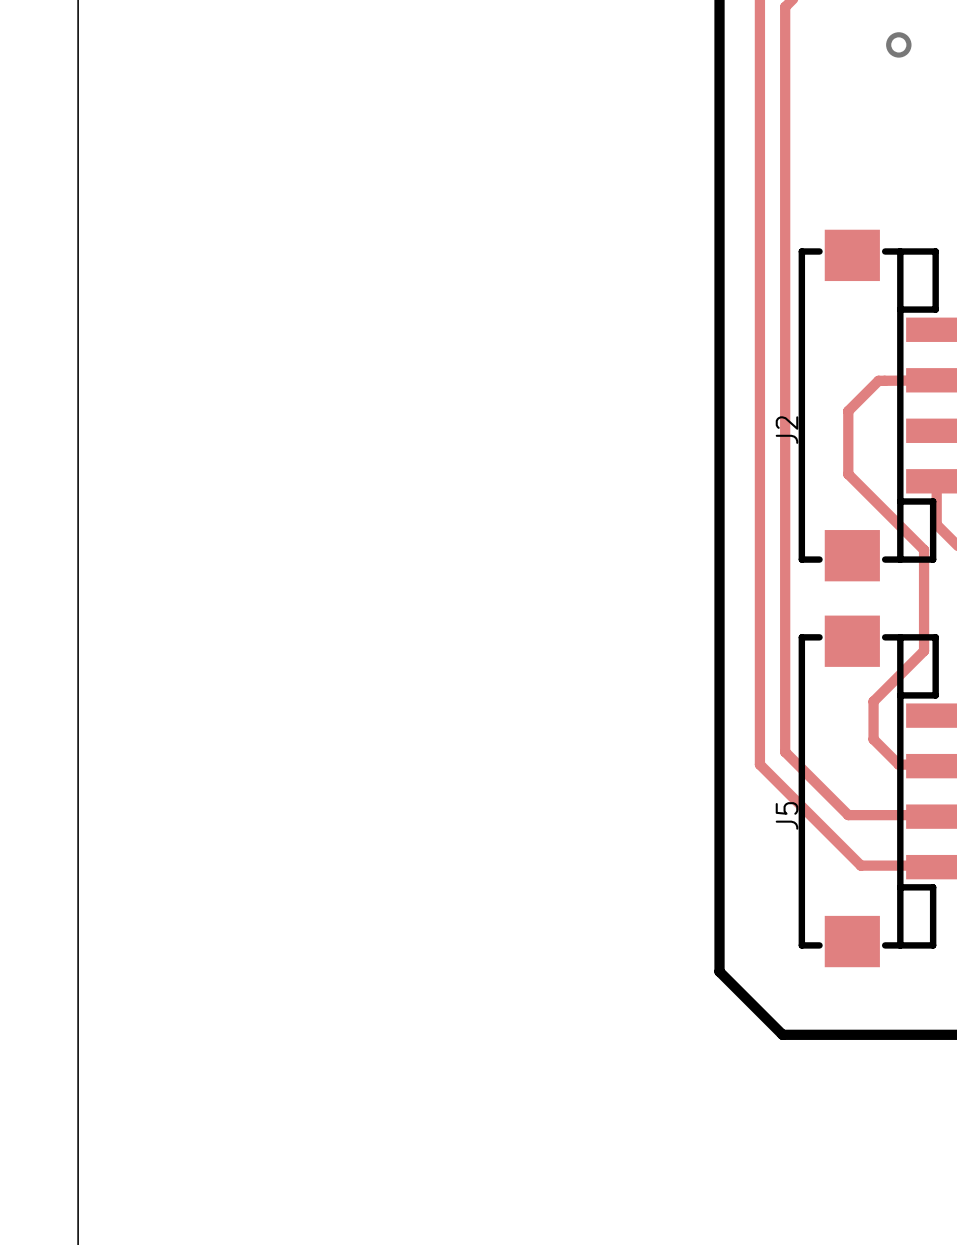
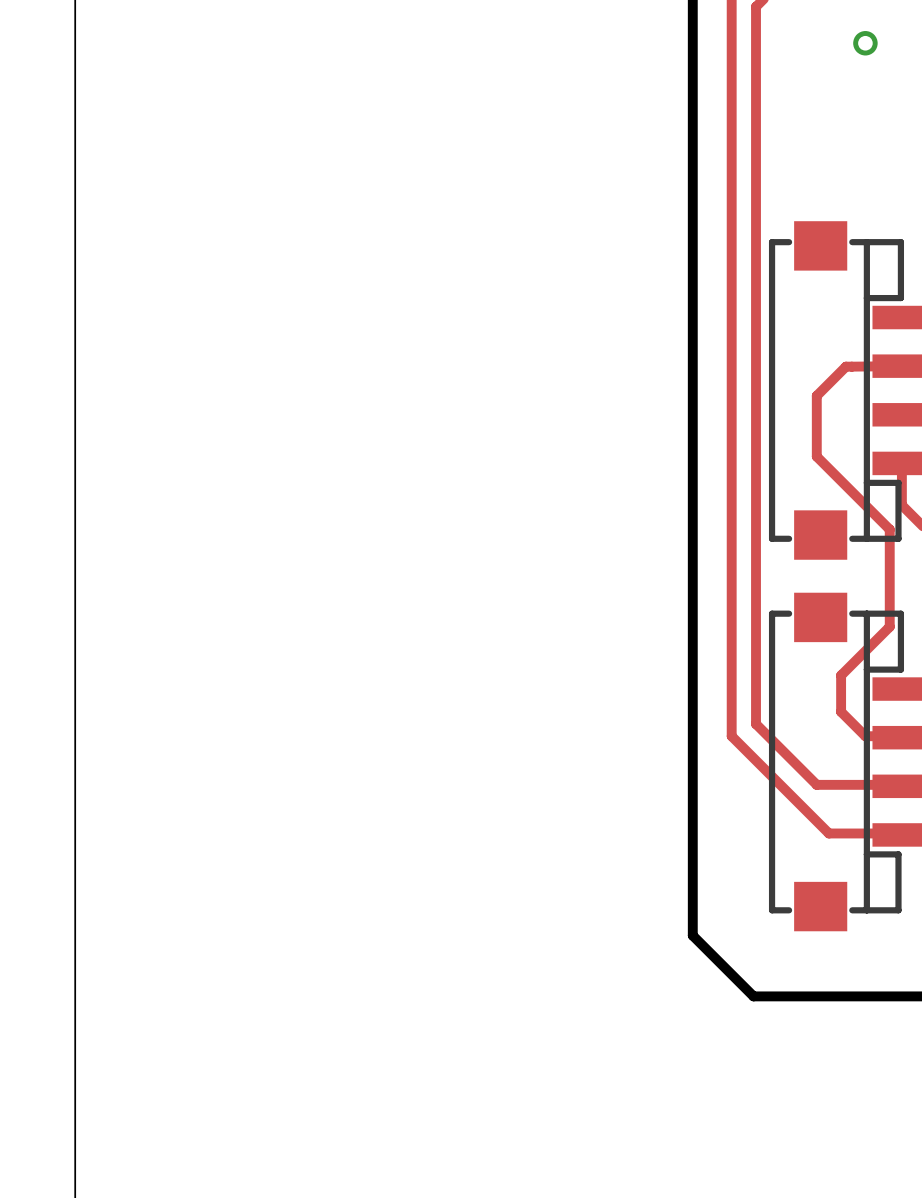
J2 name: J2 (787, 430) -> none
J5 name: J5 (787, 815) -> none

